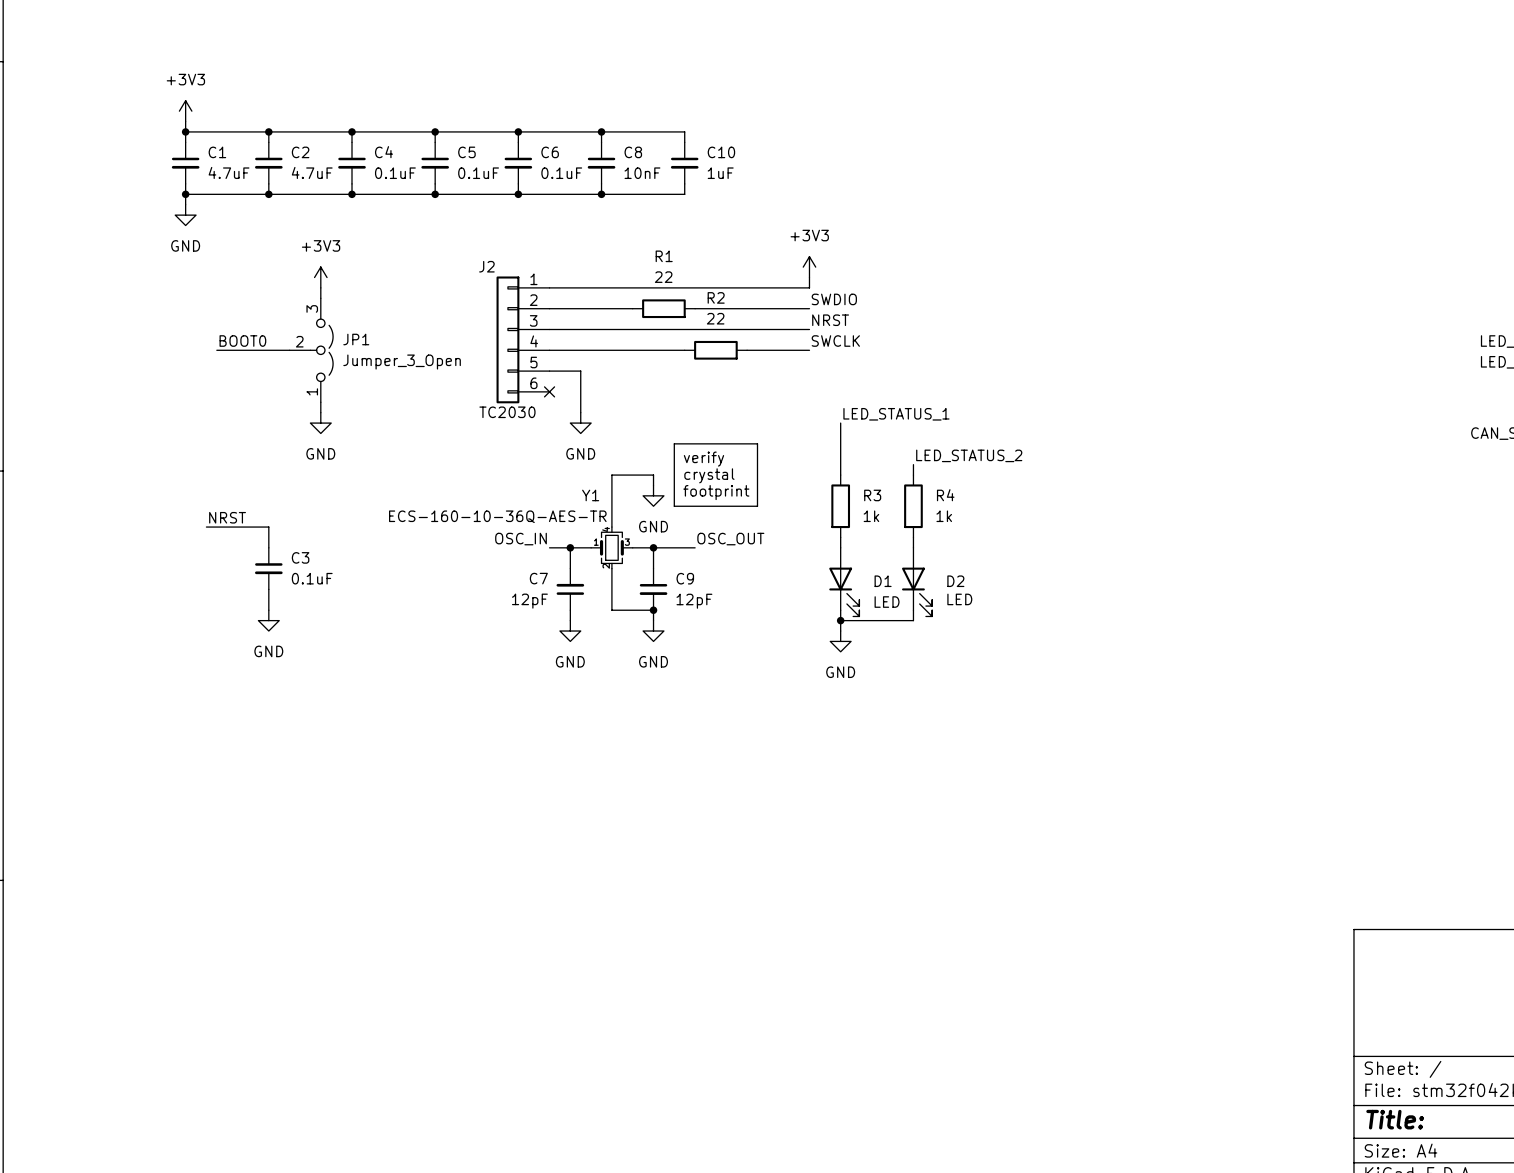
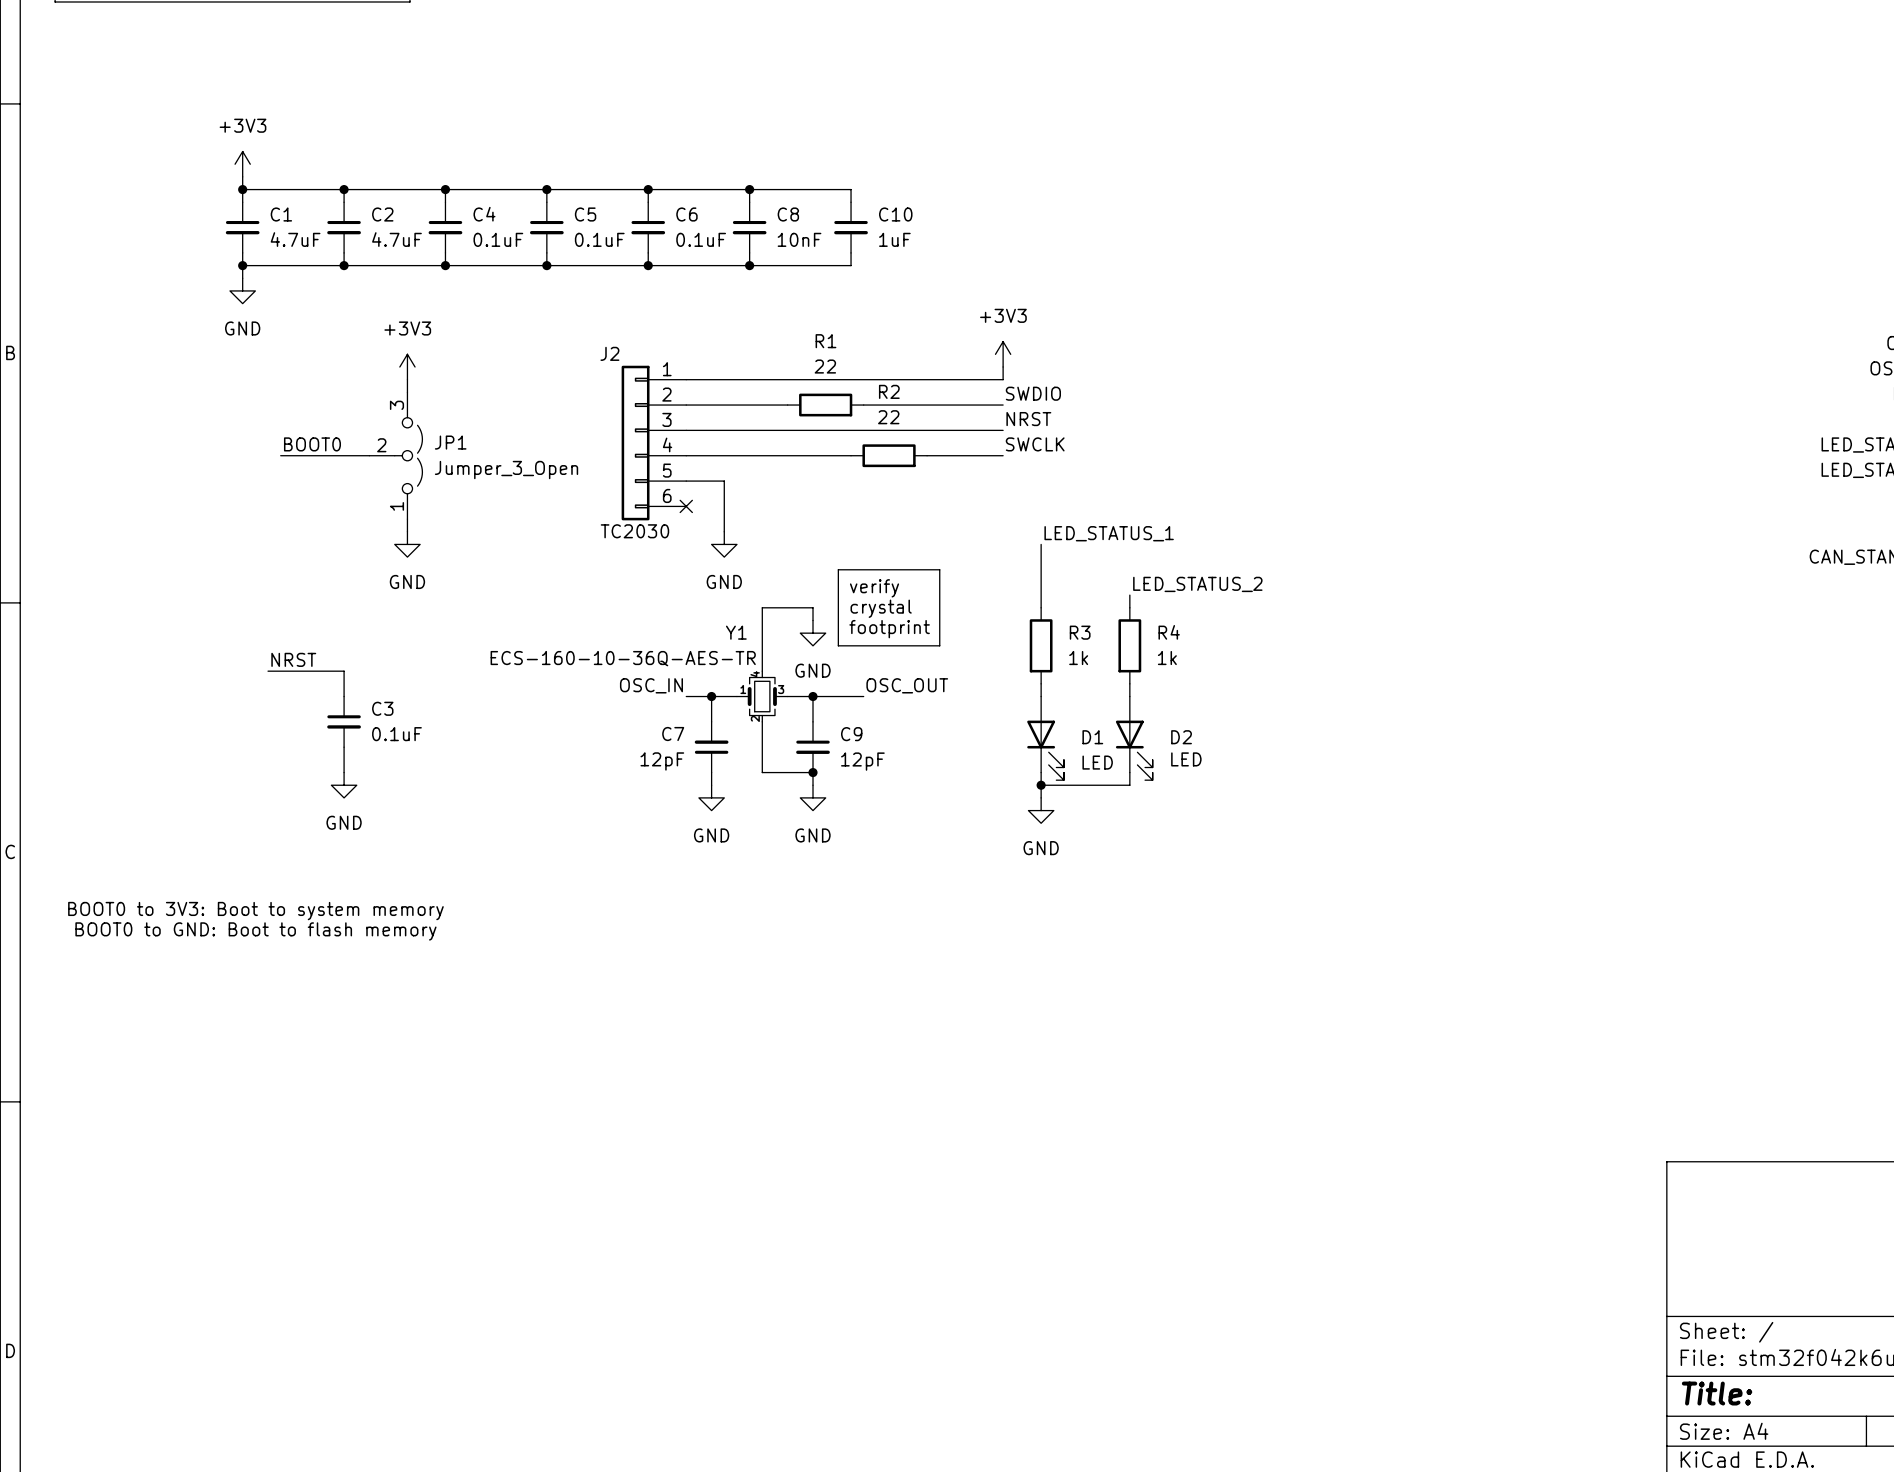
text: none -> BOOT0 to 3V3: Boot to system memory (255, 911)
text: none -> BOOT0 to GND: Boot to flash memory (255, 931)

